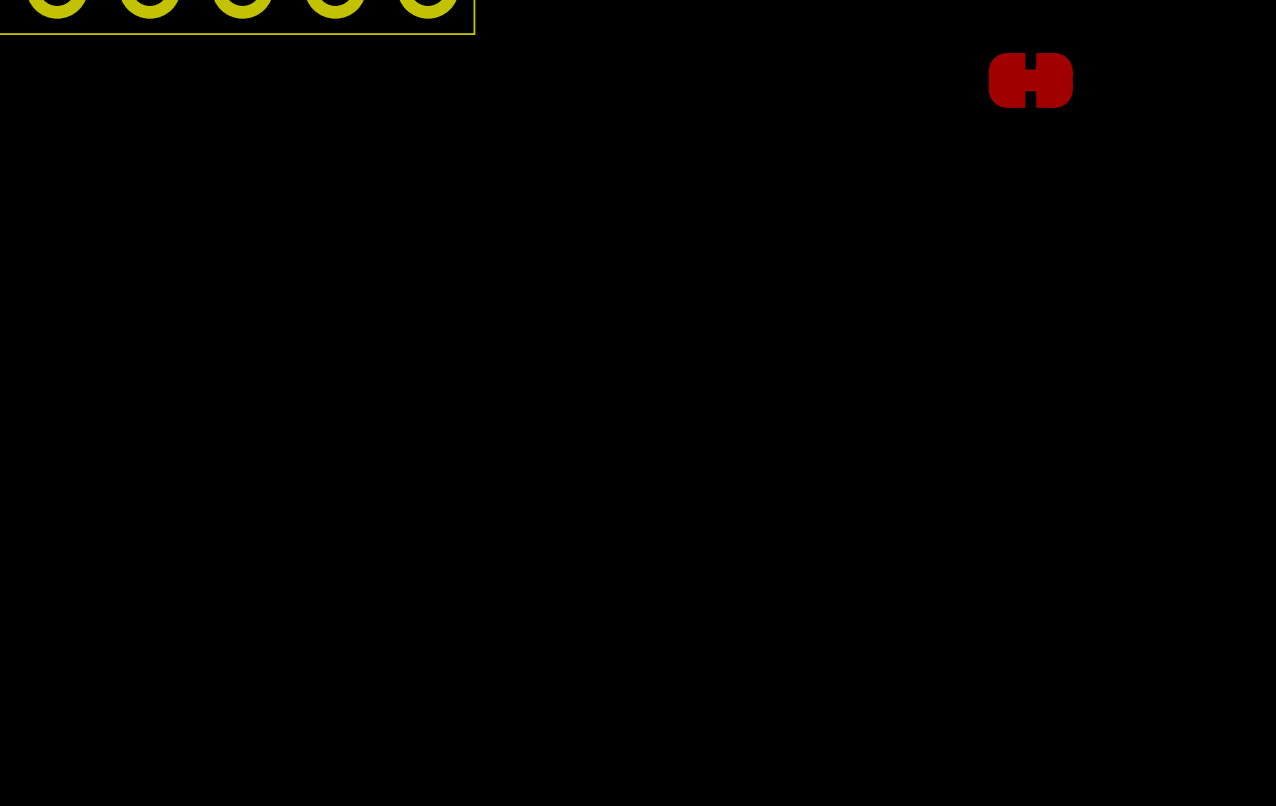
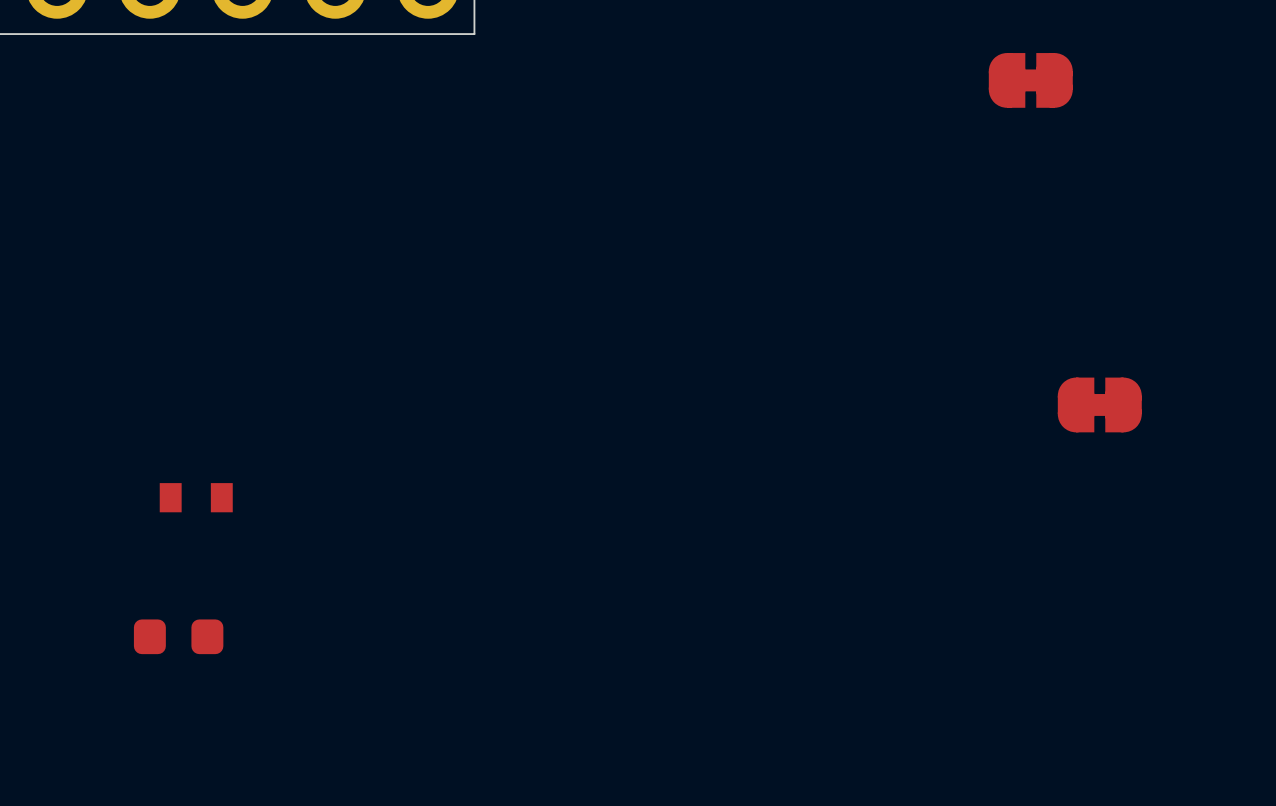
part: none -> (1099, 404)
part: none -> (196, 497)
part: none -> (178, 636)

